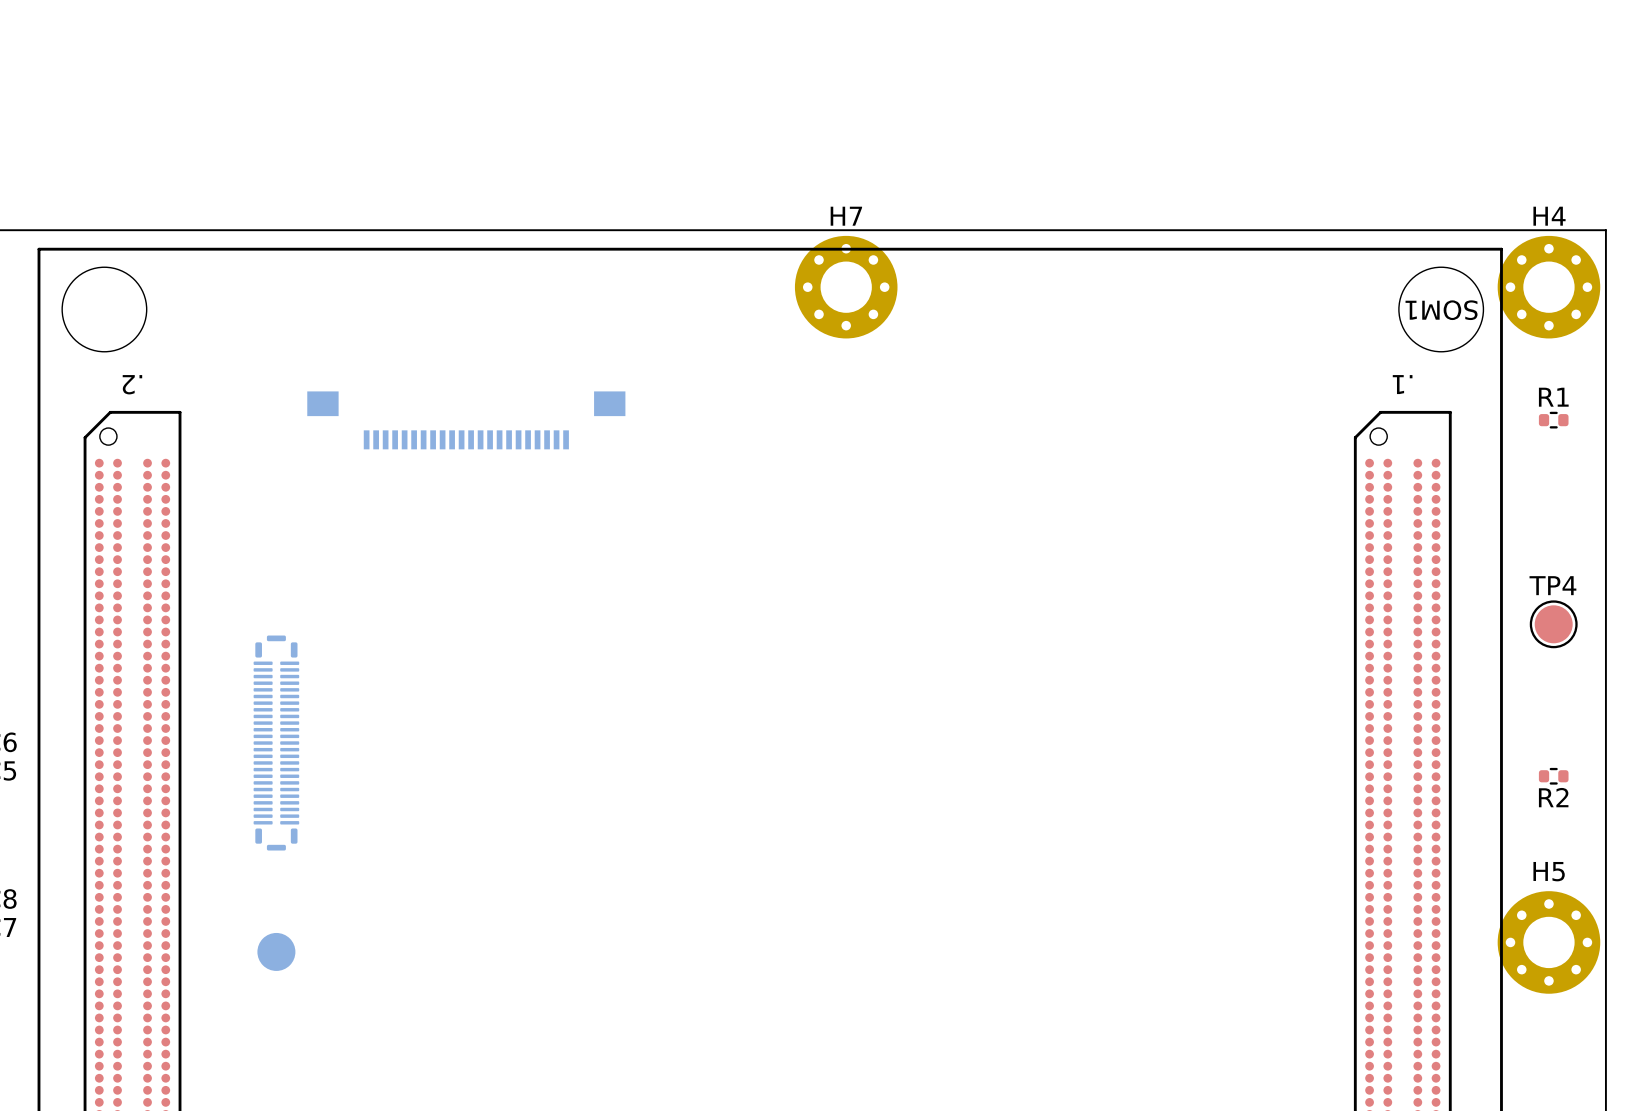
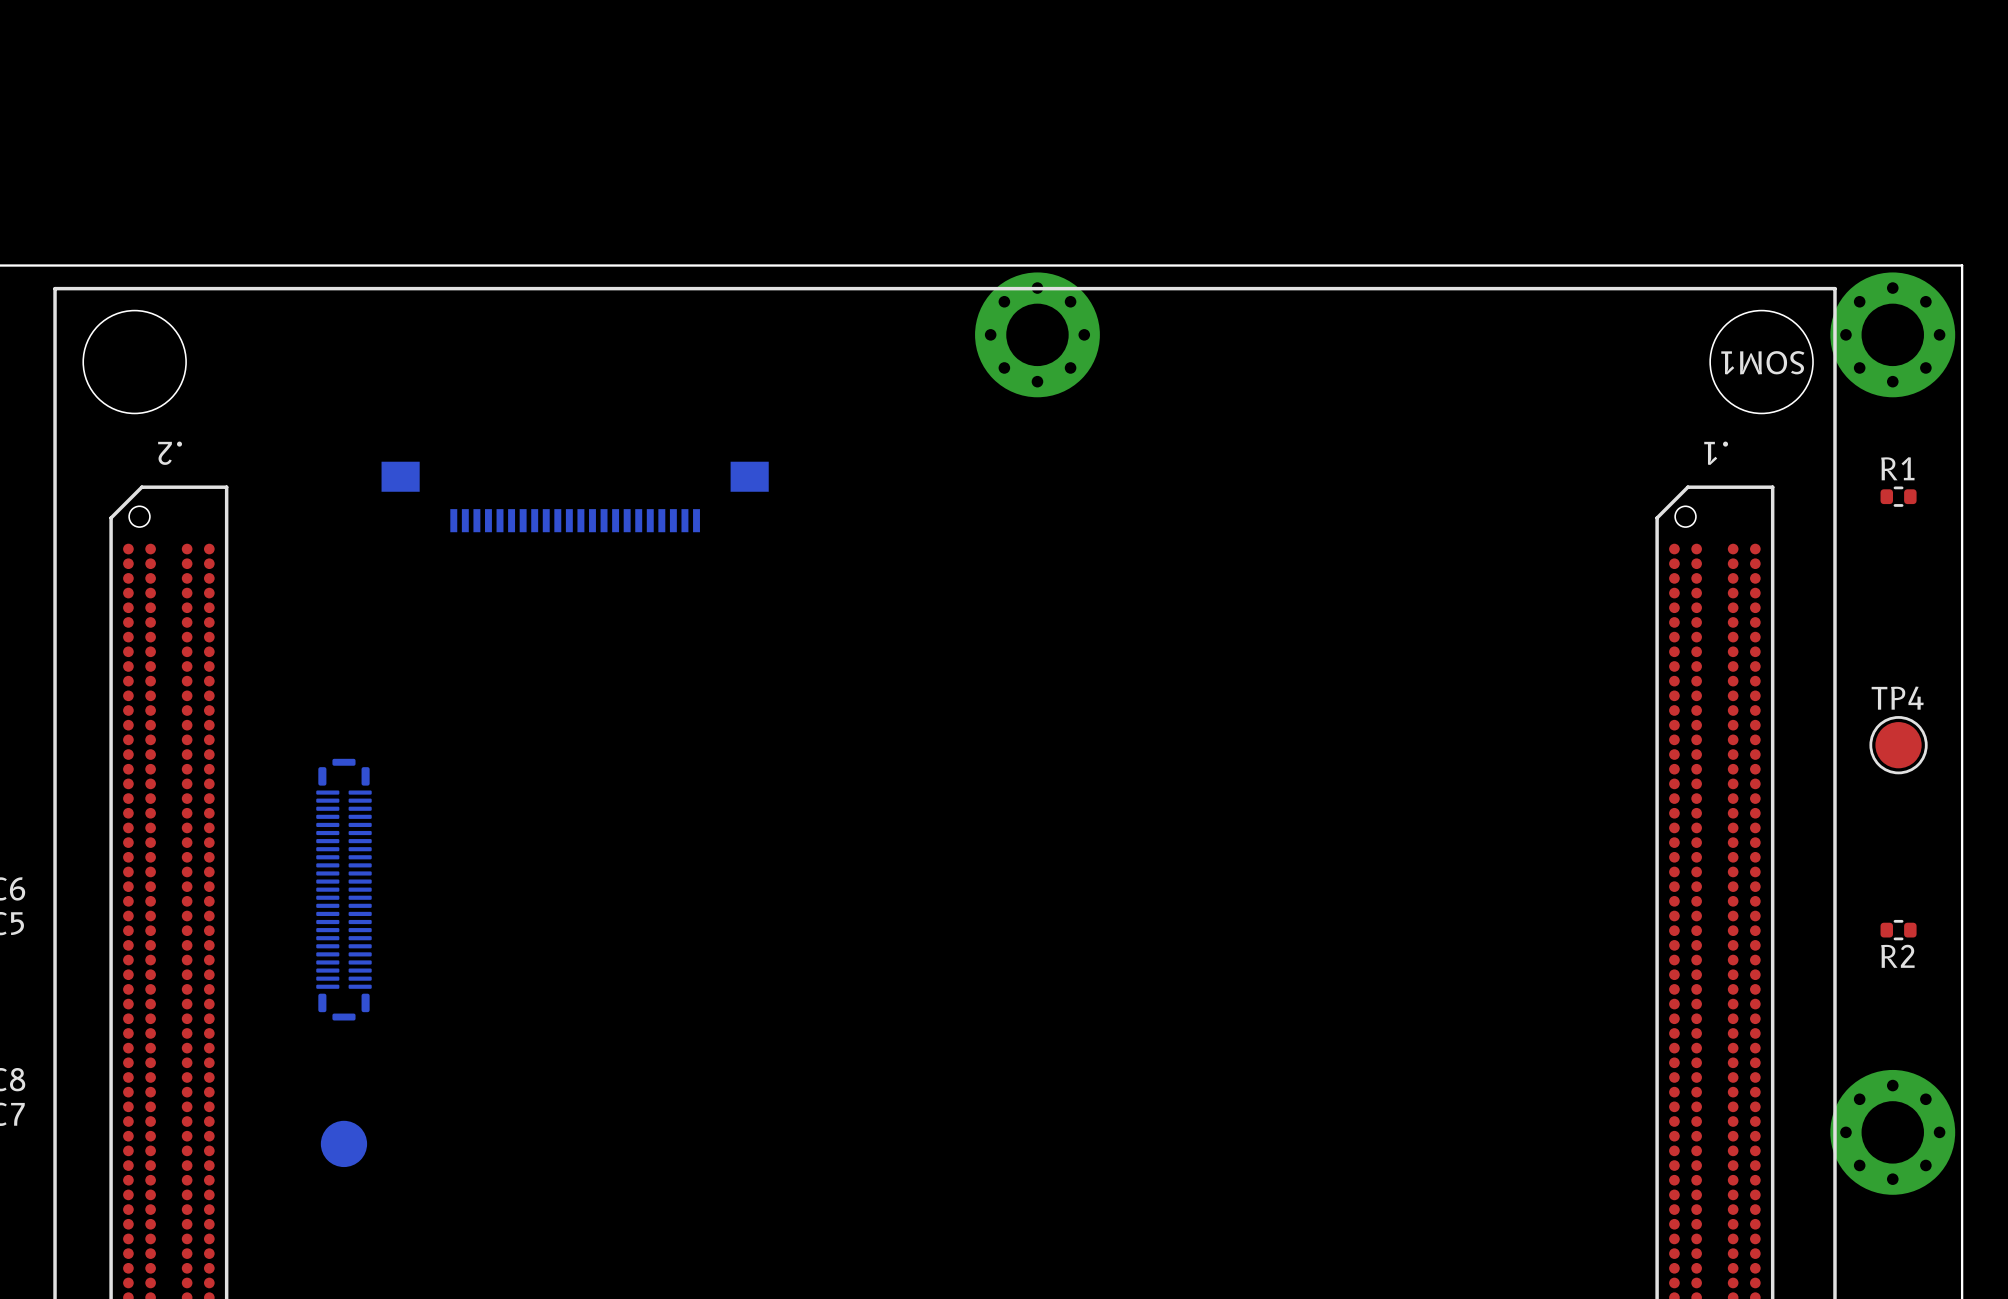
H7 name: H7 (846, 216) -> none
H4 name: H4 (1549, 216) -> none
H5 name: H5 (1549, 871) -> none

